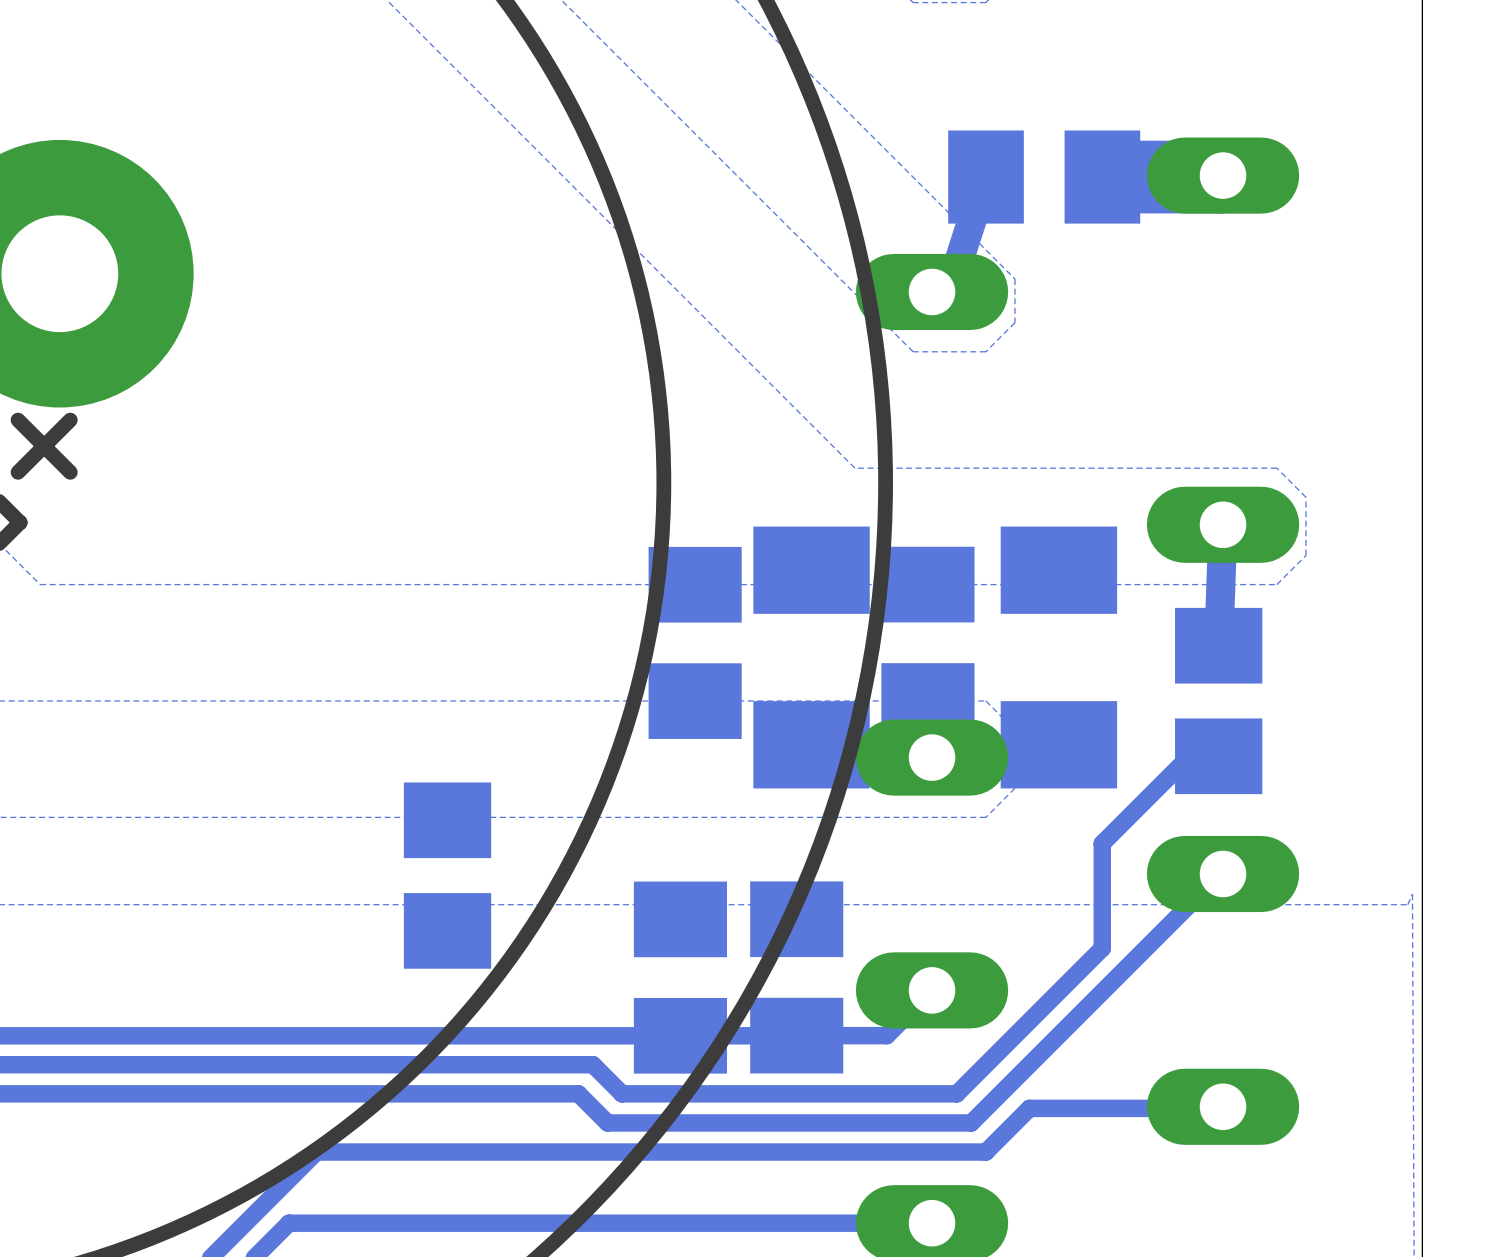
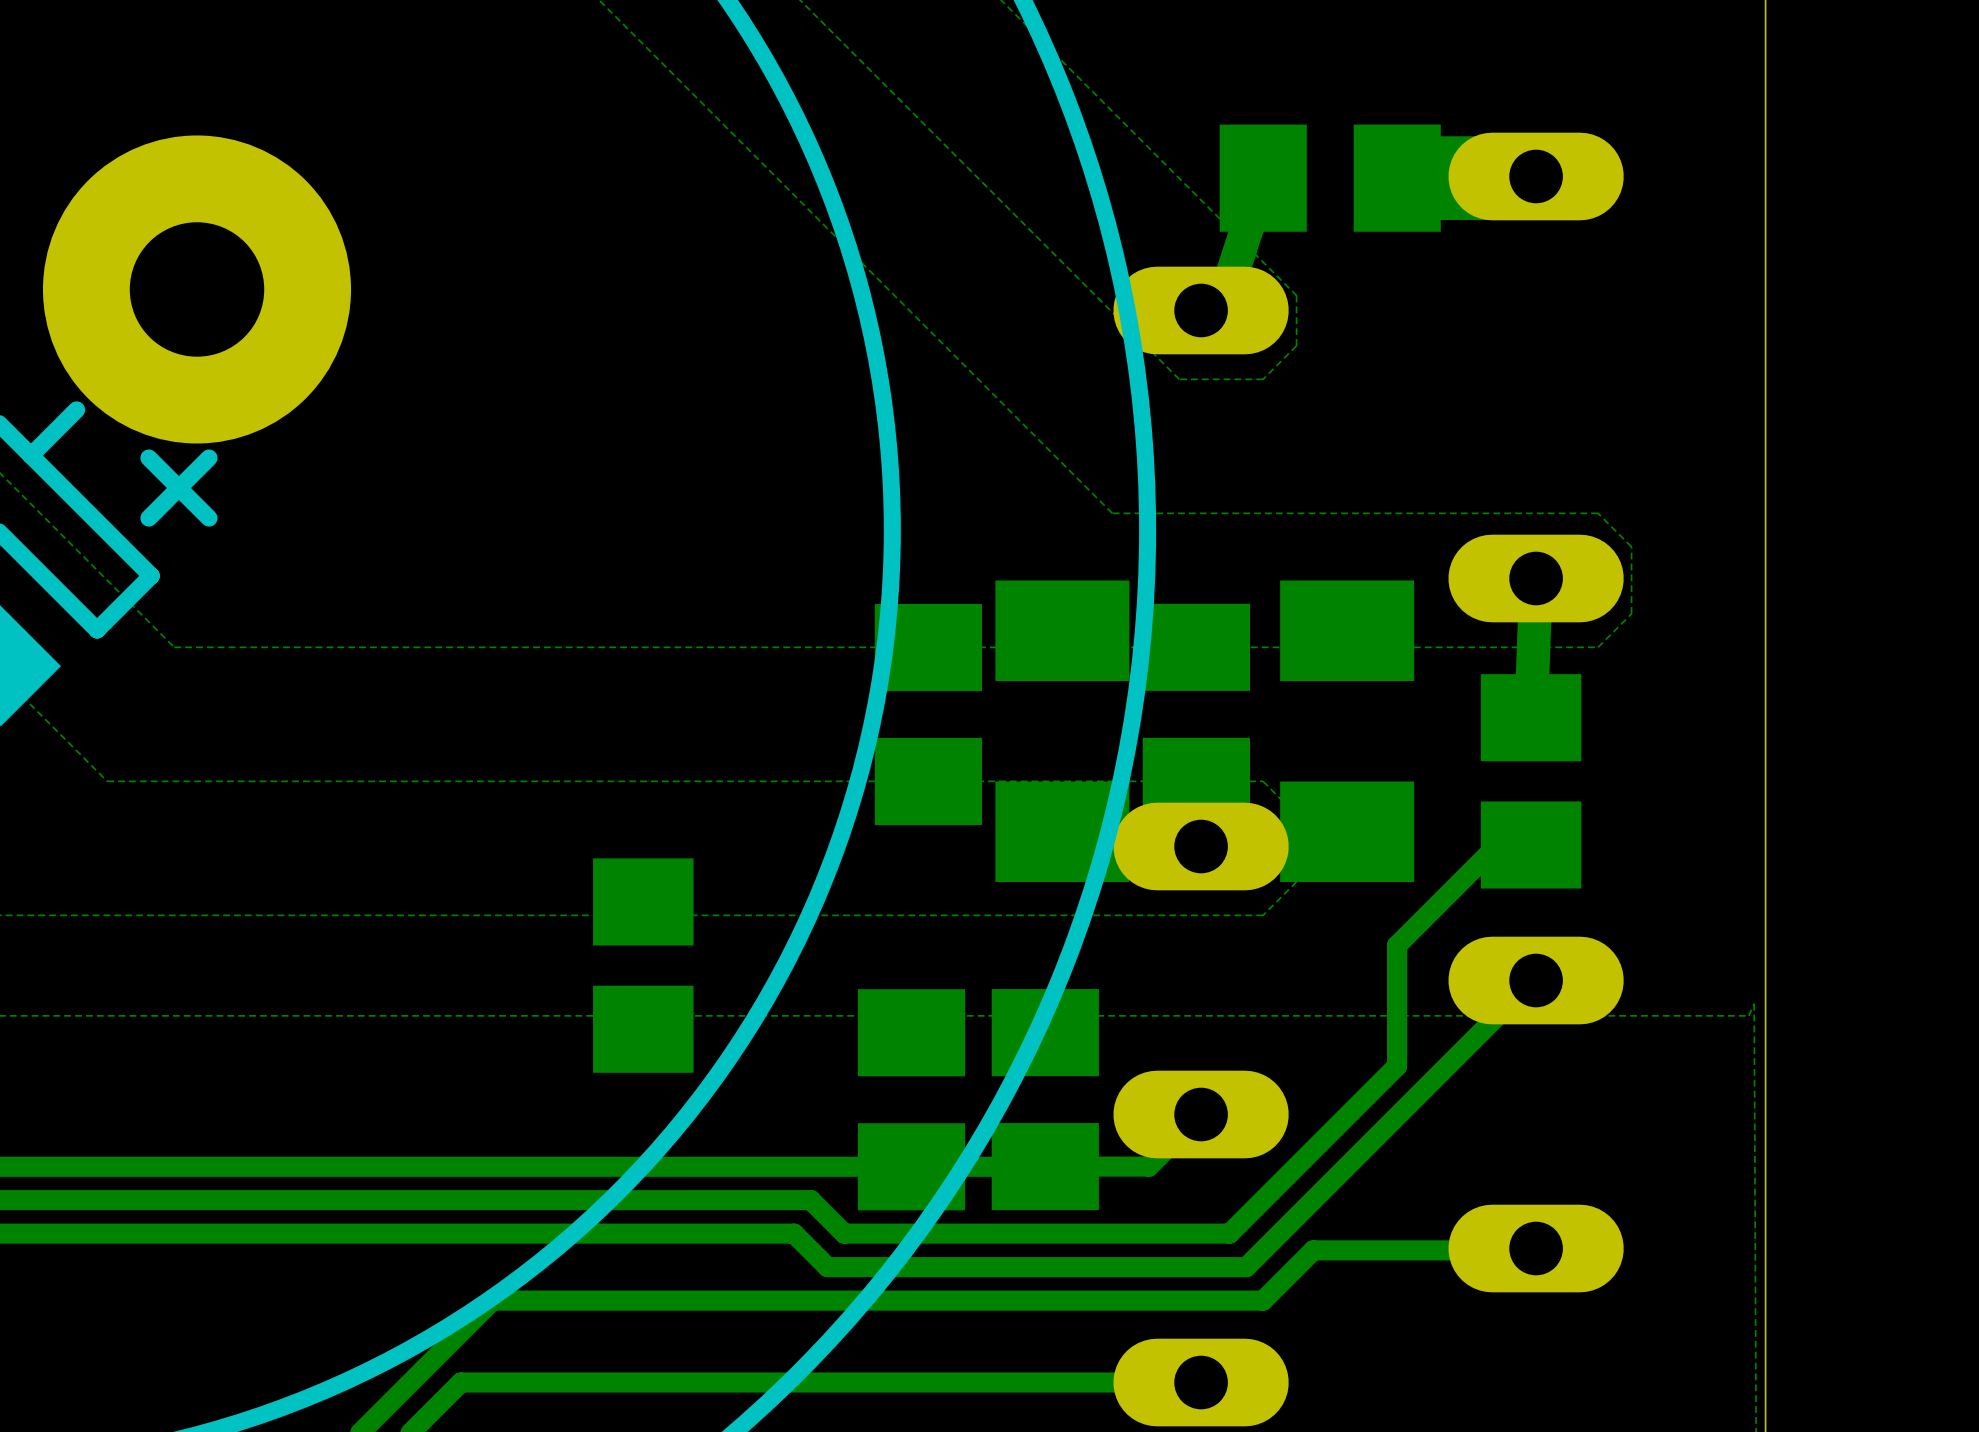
part position: (447, 875) -> (643, 965)

